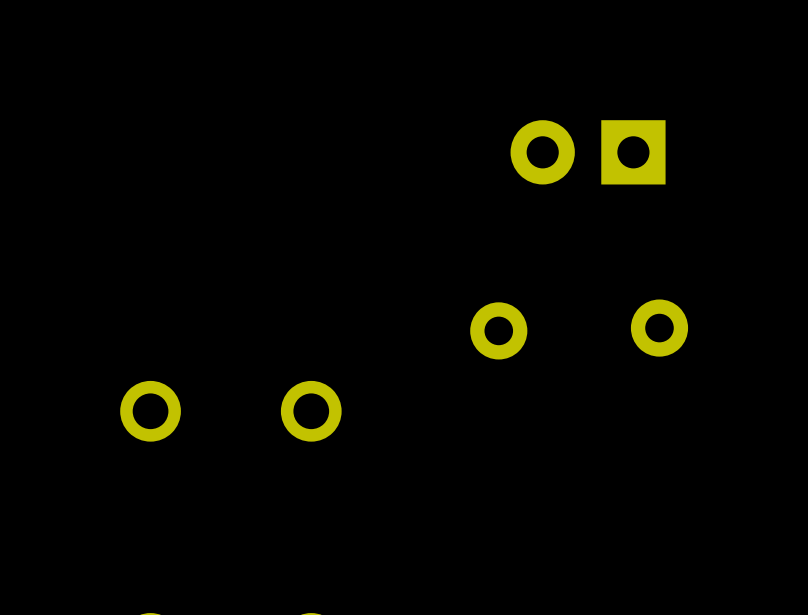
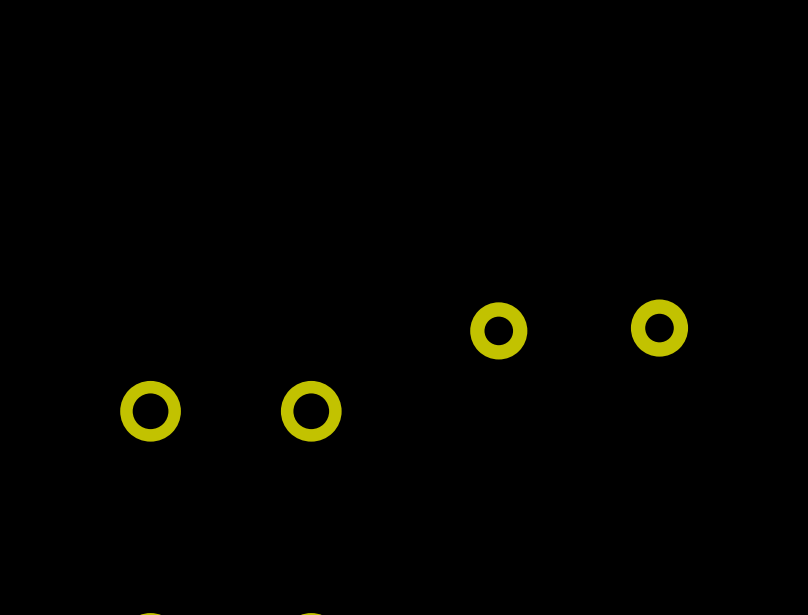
part: (588, 152) -> none

